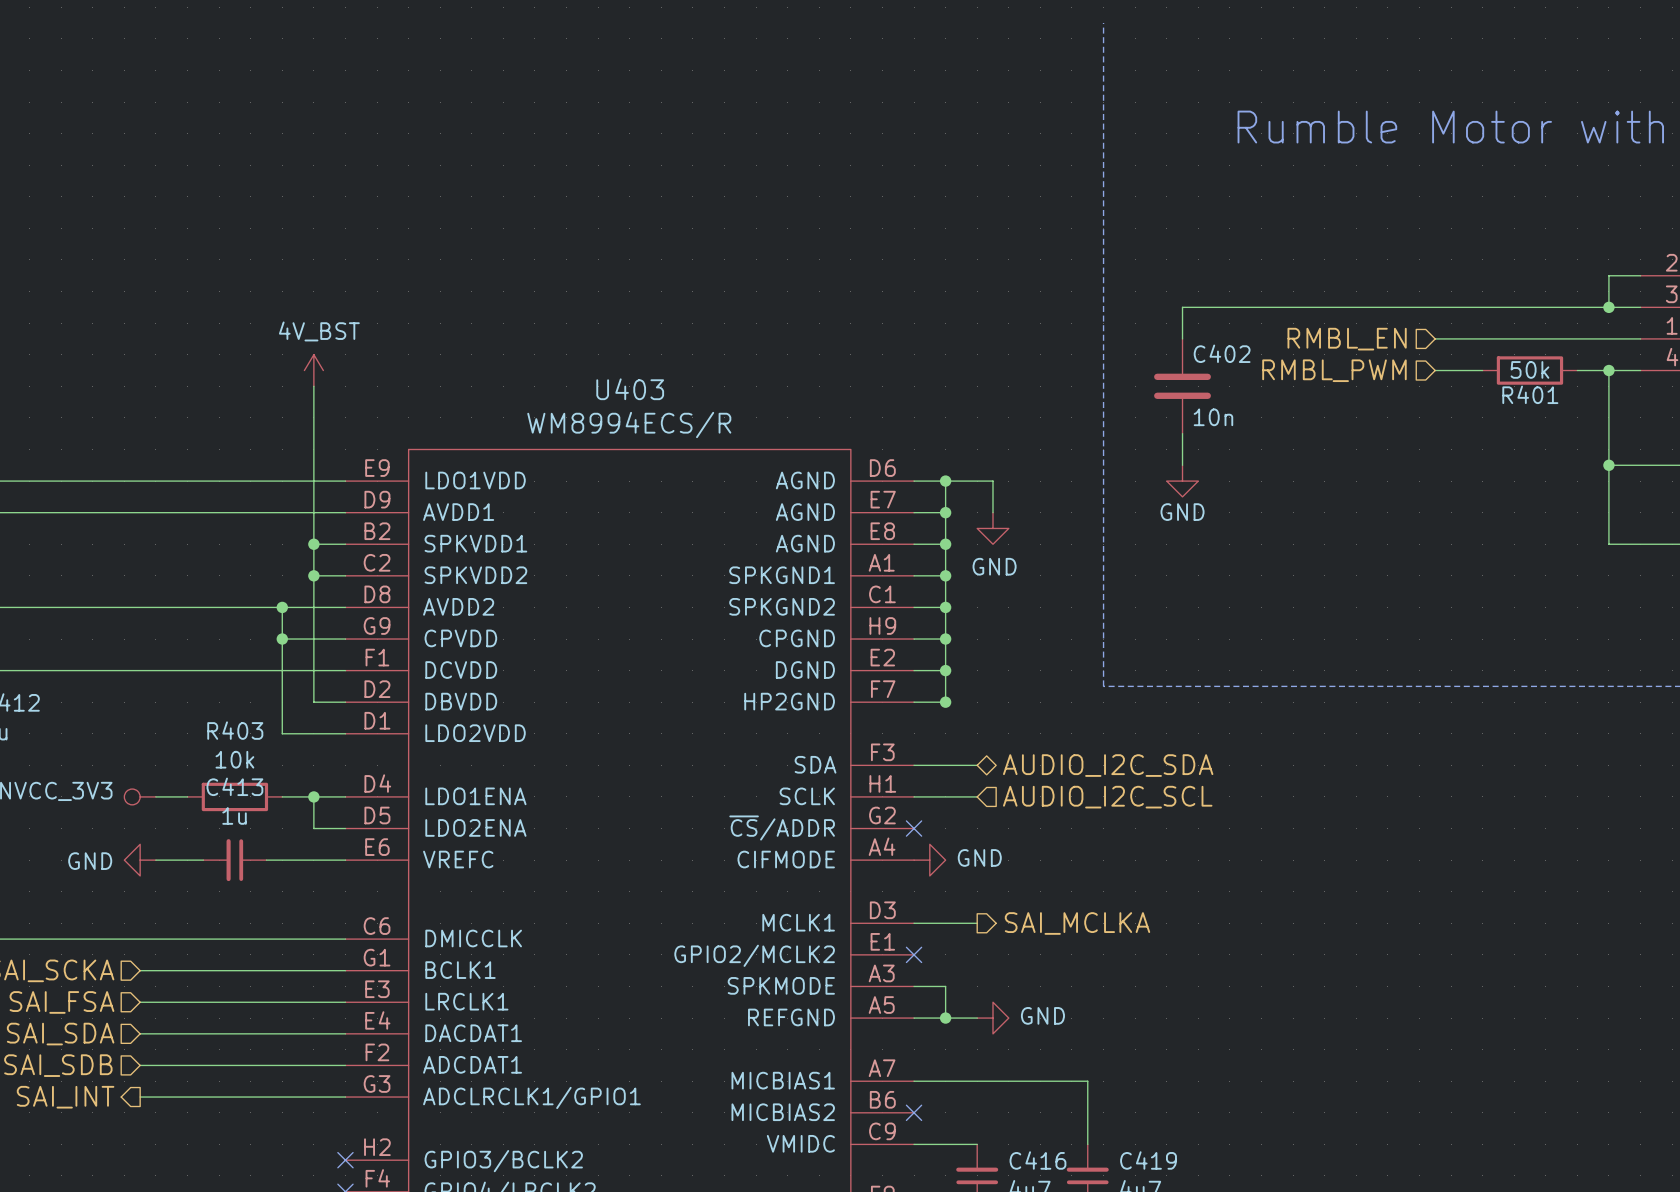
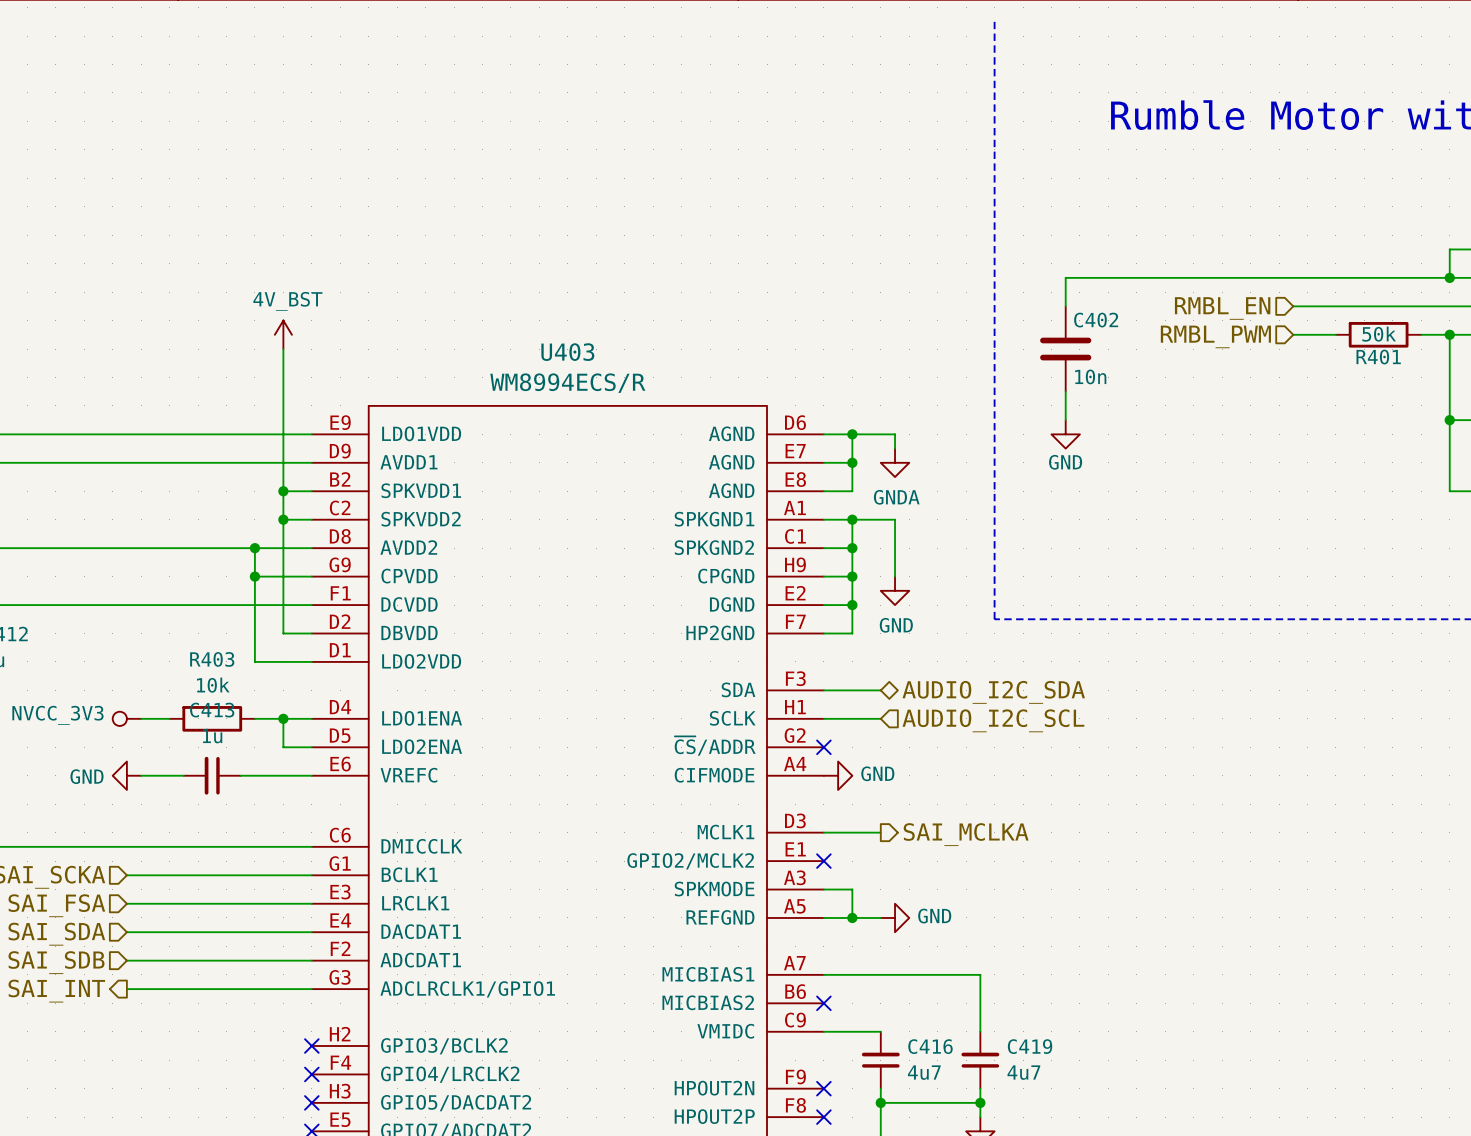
power symbol: none -> GNDA (895, 462)
power symbol position: GND (992, 528) -> GND (895, 590)
wire: (945, 544) (945, 575) -> (895, 576) (895, 519) (852, 519)
junction: (945, 544) -> none
junction: (945, 702) -> none

